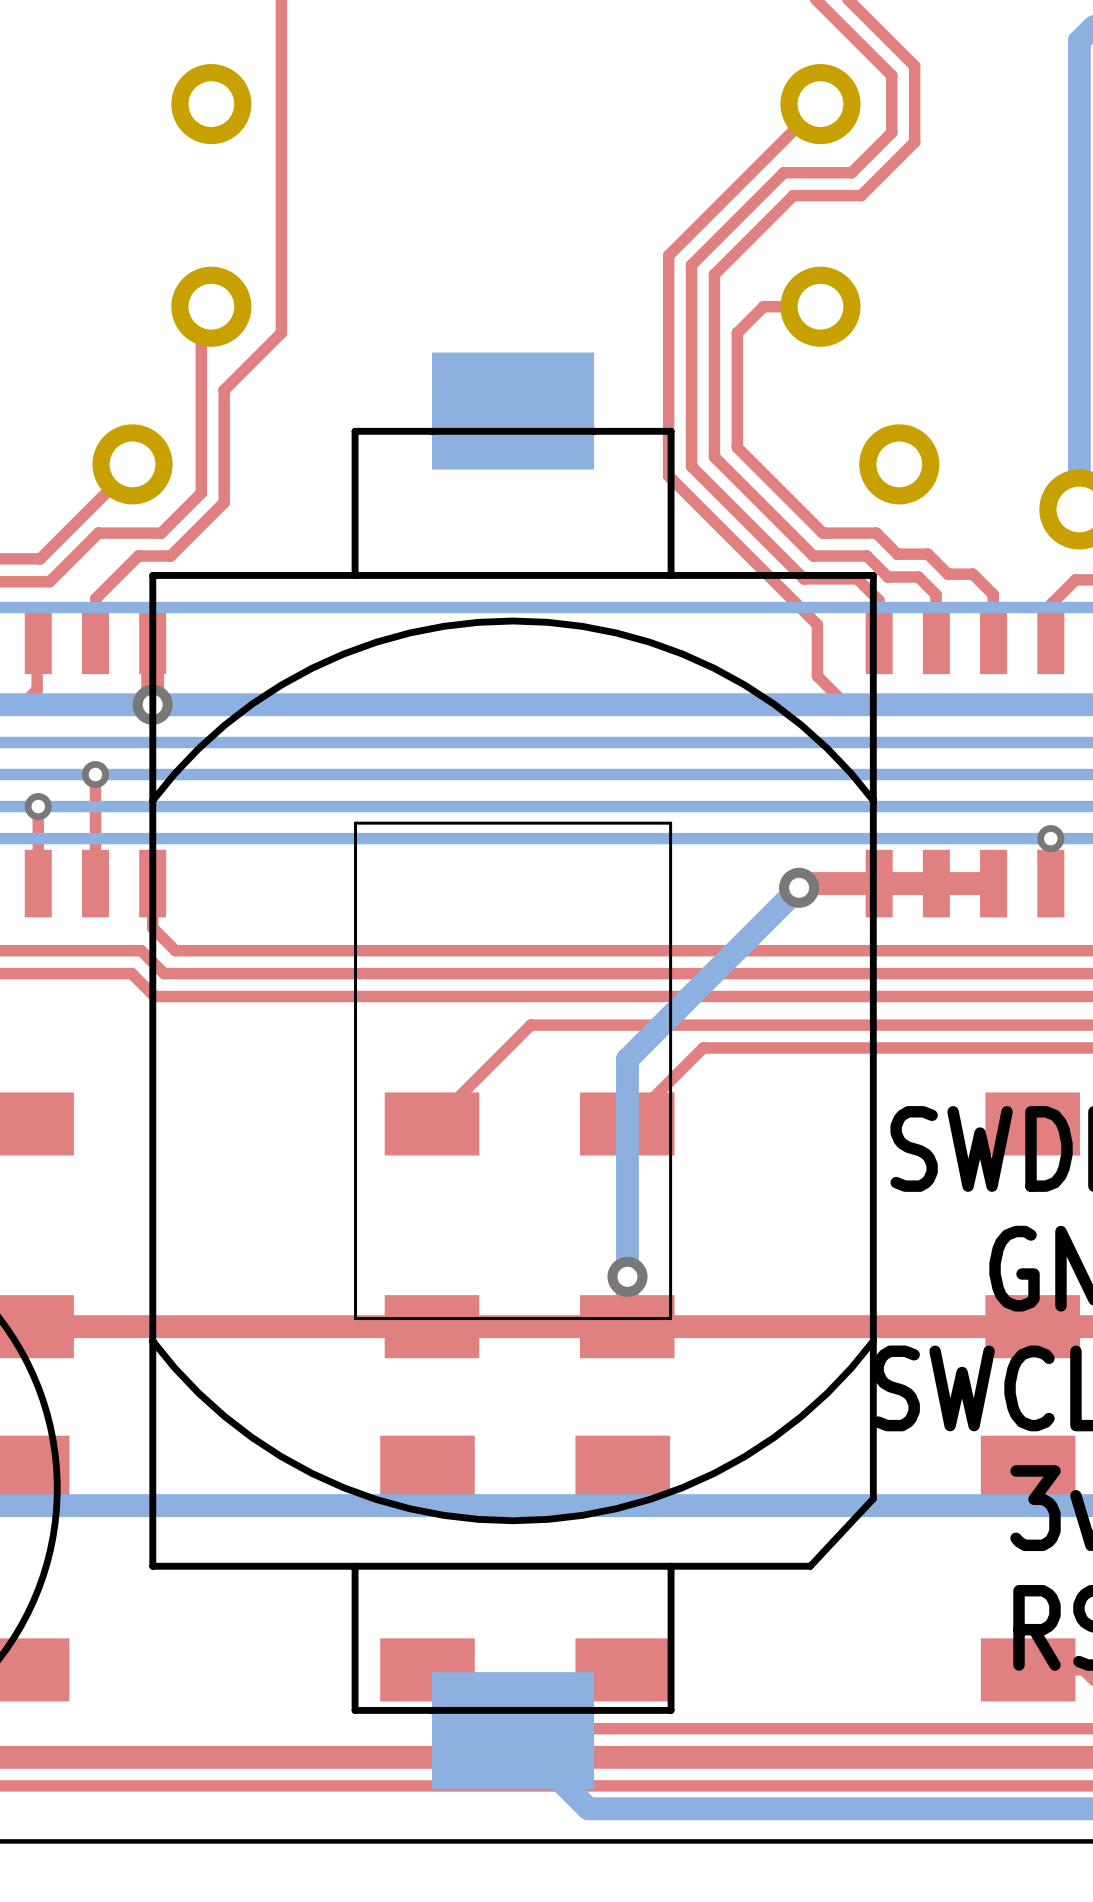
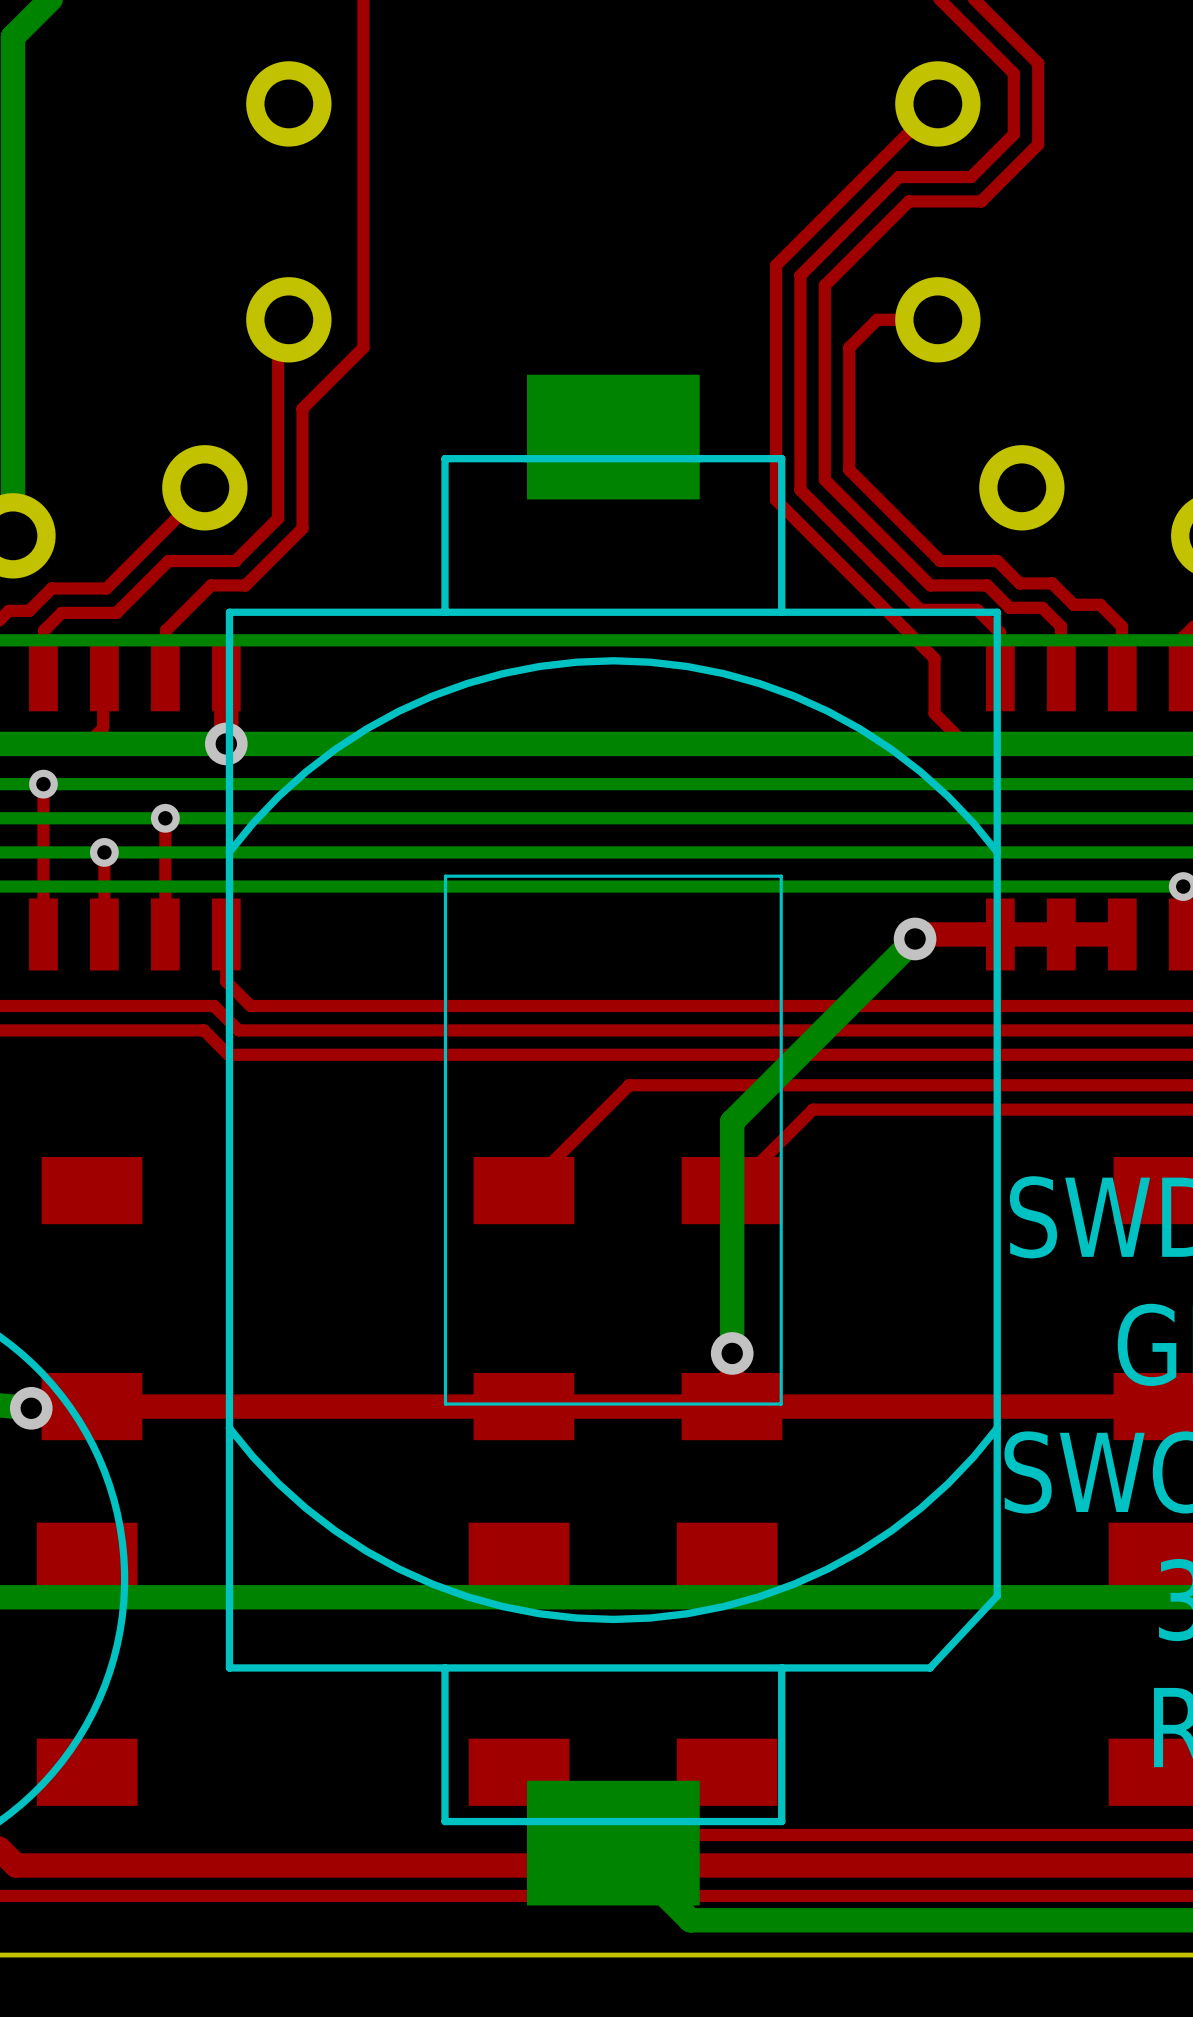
part footprint: [149, 352, 877, 1790] -> [225, 374, 1001, 1906]

